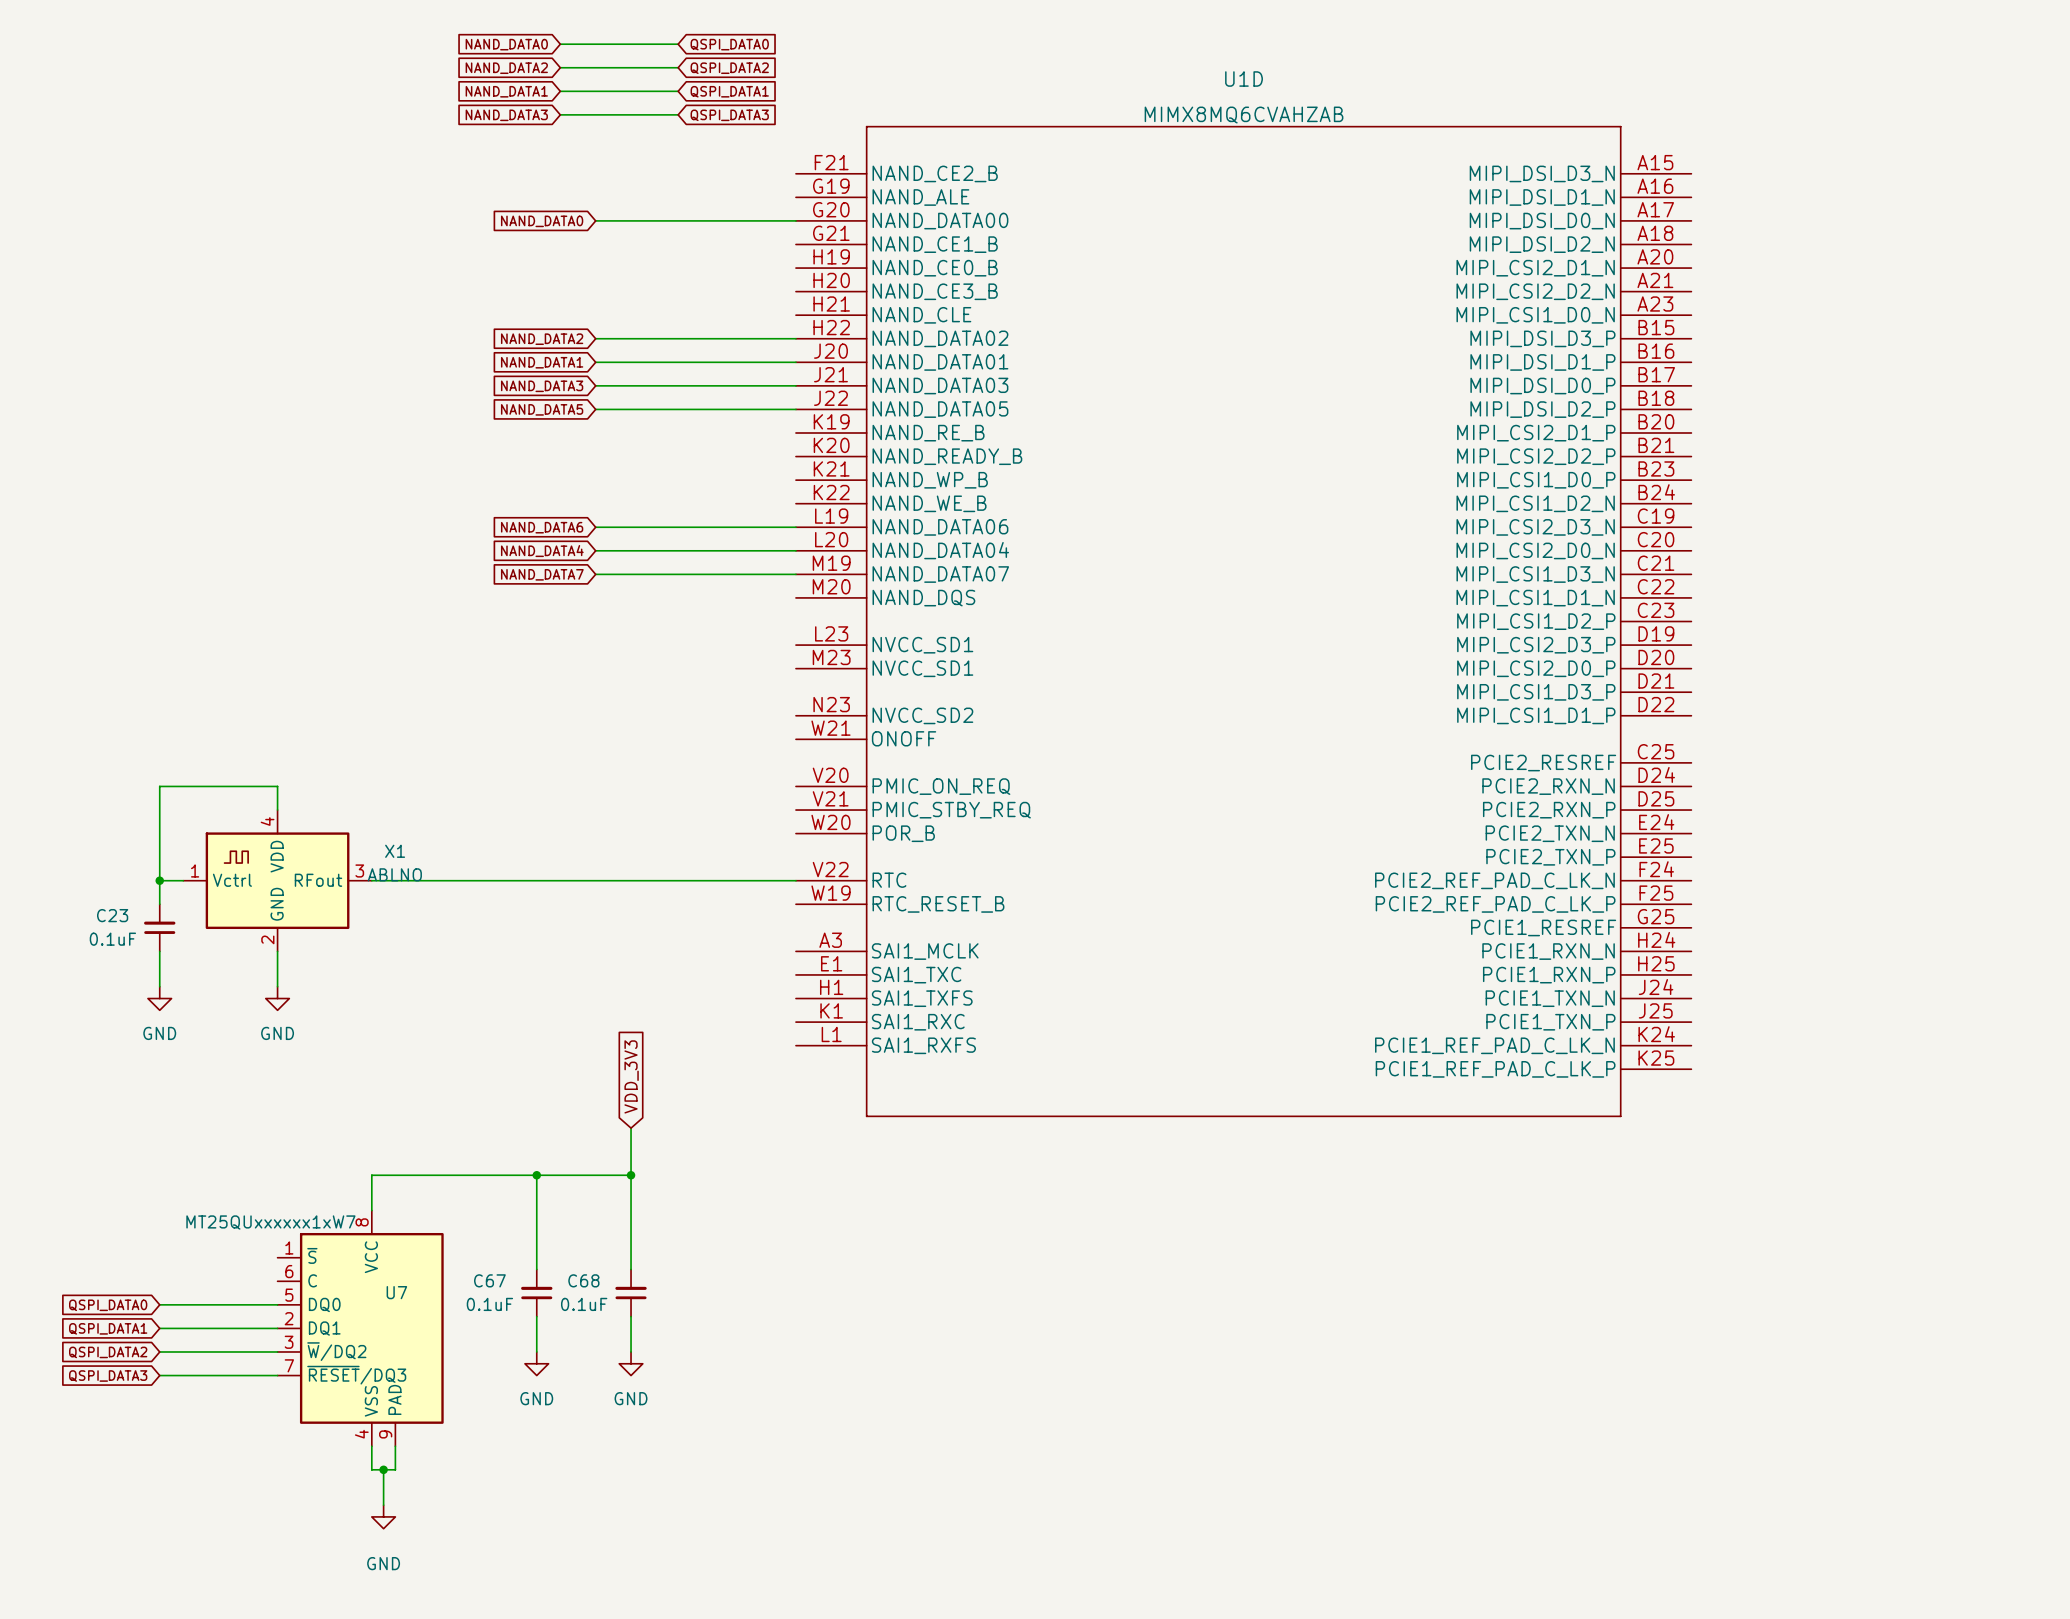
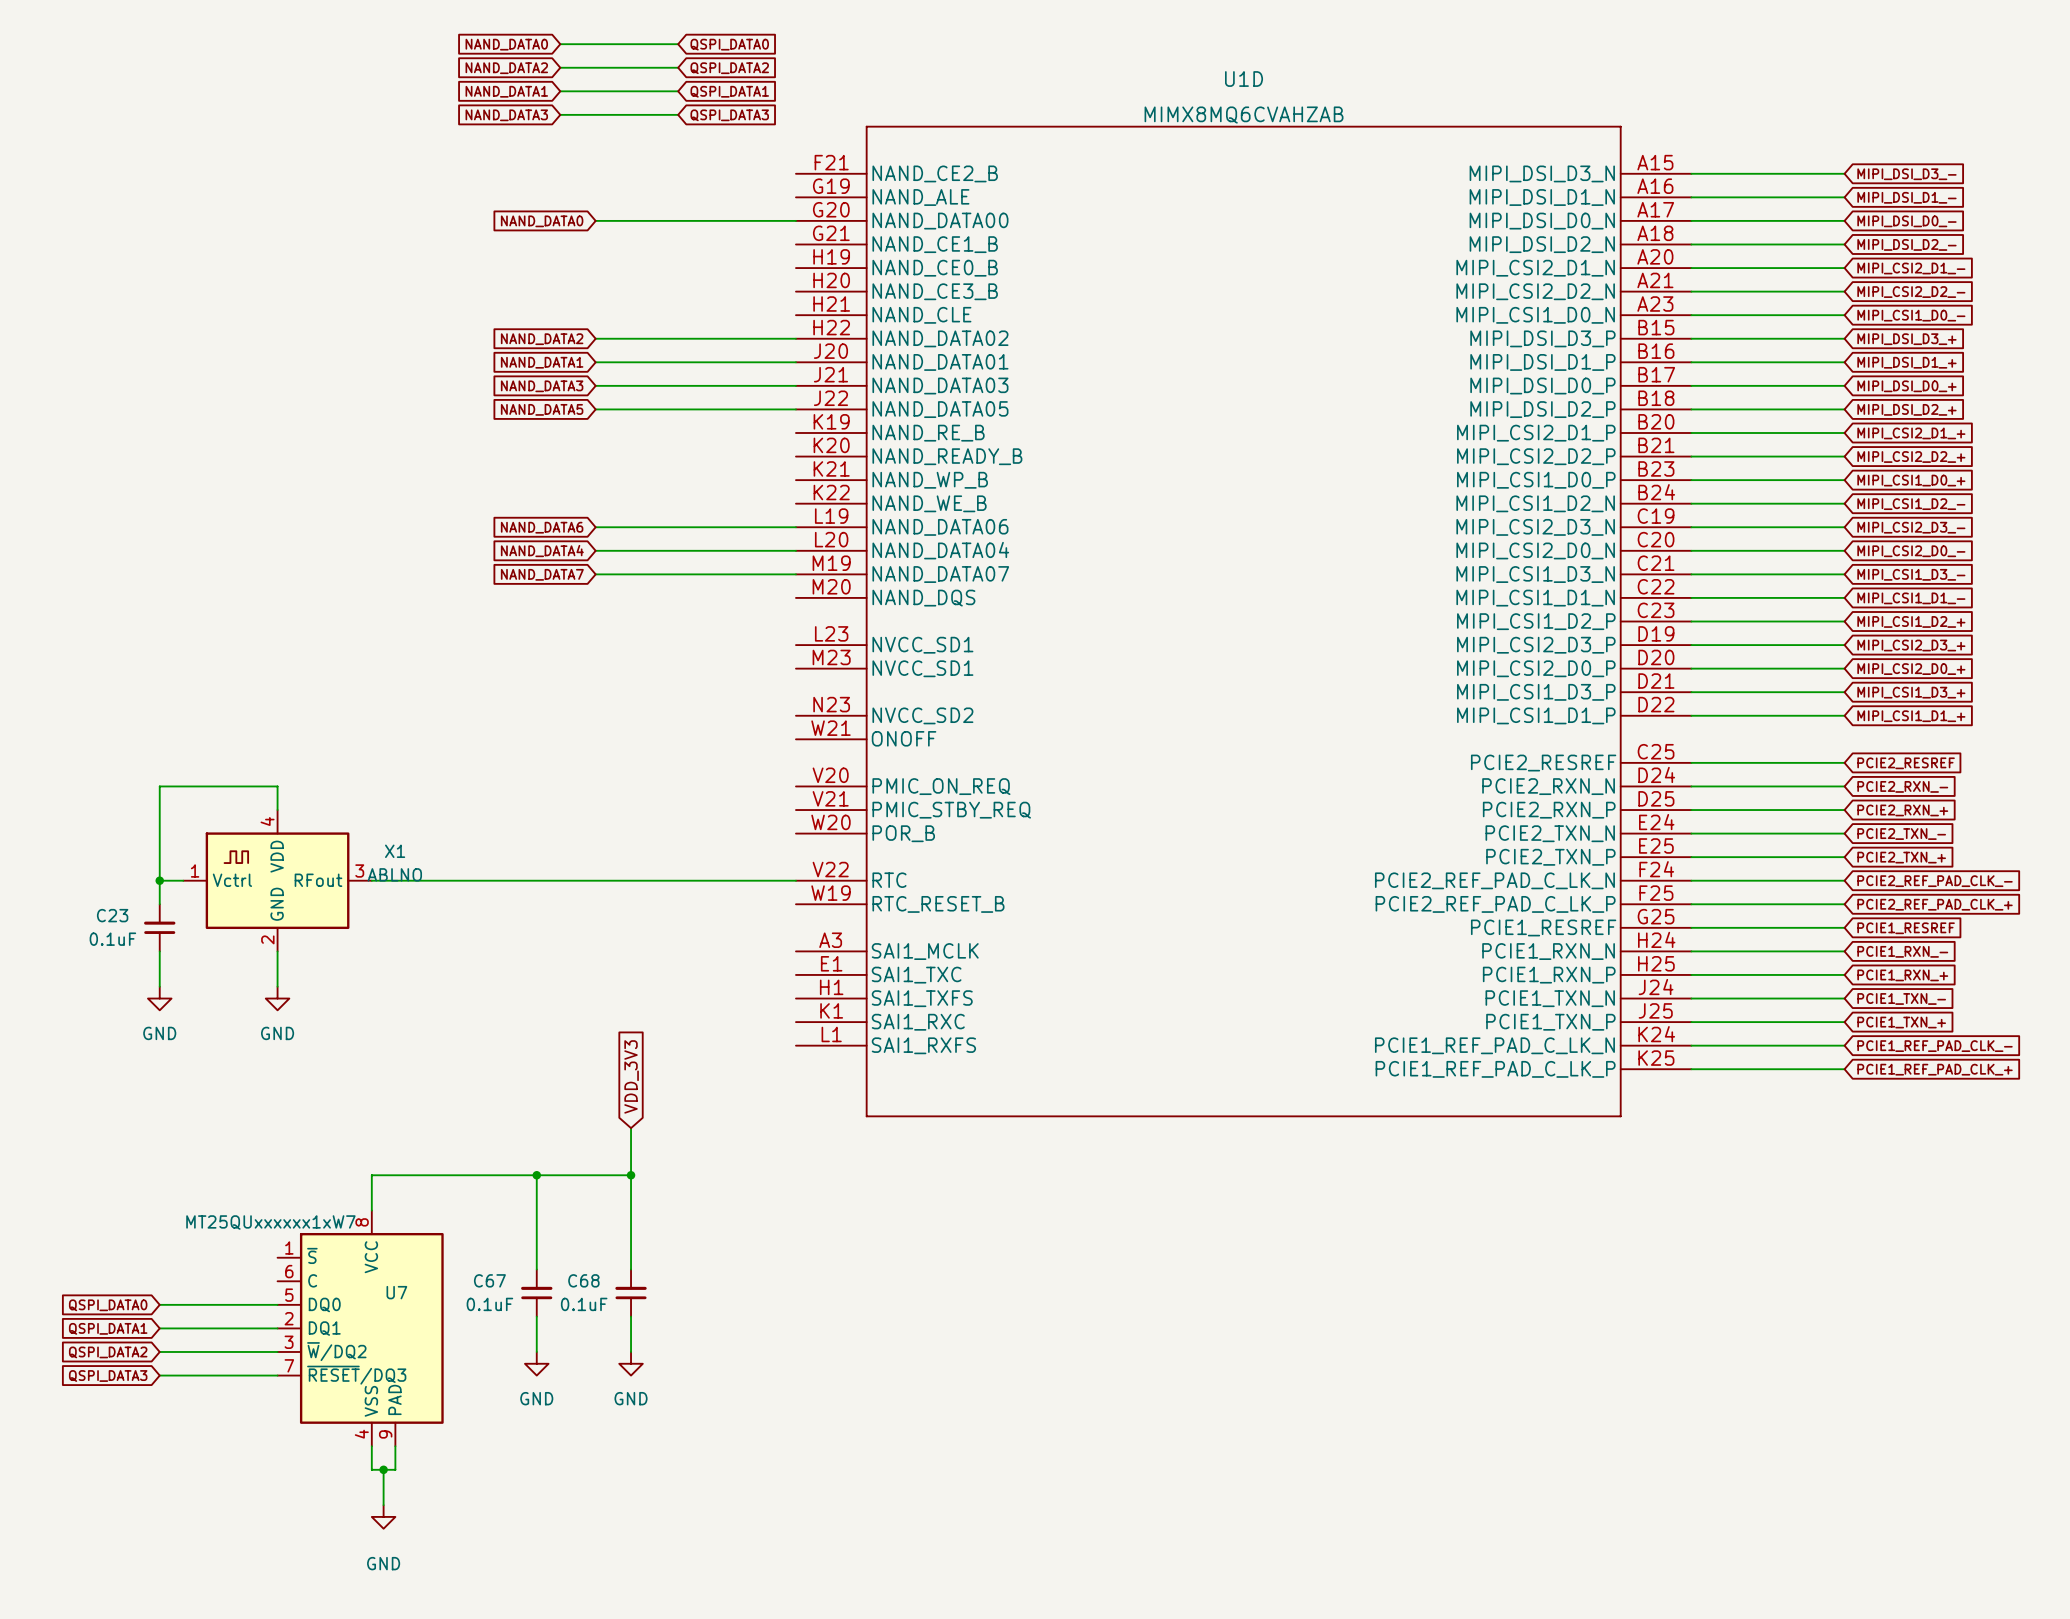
wire: none -> (1691, 173) (1844, 173)
global label: none -> MIPI_DSI_D3_- (1906, 174)
wire: none -> (1691, 197) (1844, 197)
global label: none -> MIPI_DSI_D1_- (1906, 197)
wire: none -> (1691, 220) (1844, 220)
global label: none -> MIPI_DSI_D0_- (1906, 221)
wire: none -> (1691, 244) (1844, 244)
global label: none -> MIPI_DSI_D2_- (1906, 244)
wire: none -> (1691, 268) (1844, 268)
global label: none -> MIPI_CSI2_D1_- (1911, 268)
wire: none -> (1691, 291) (1844, 291)
global label: none -> MIPI_CSI2_D2_- (1911, 292)
wire: none -> (1691, 315) (1844, 315)
global label: none -> MIPI_CSI1_D0_- (1911, 315)
wire: none -> (1691, 338) (1844, 338)
global label: none -> MIPI_DSI_D3_+ (1906, 339)
wire: none -> (1691, 362) (1844, 362)
global label: none -> MIPI_DSI_D1_+ (1906, 362)
wire: none -> (1691, 385) (1844, 385)
global label: none -> MIPI_DSI_D0_+ (1906, 386)
wire: none -> (1691, 409) (1844, 409)
global label: none -> MIPI_DSI_D2_+ (1906, 409)
wire: none -> (1691, 432) (1844, 432)
global label: none -> MIPI_CSI2_D1_+ (1911, 433)
wire: none -> (1691, 456) (1844, 456)
global label: none -> MIPI_CSI2_D2_+ (1911, 457)
wire: none -> (1691, 480) (1844, 480)
global label: none -> MIPI_CSI1_D0_+ (1911, 480)
wire: none -> (1691, 503) (1844, 503)
global label: none -> MIPI_CSI1_D2_- (1911, 504)
wire: none -> (1691, 527) (1844, 527)
global label: none -> MIPI_CSI2_D3_- (1911, 527)
wire: none -> (1691, 550) (1844, 550)
global label: none -> MIPI_CSI2_D0_- (1911, 551)
wire: none -> (1691, 574) (1844, 574)
global label: none -> MIPI_CSI1_D3_- (1911, 574)
wire: none -> (1691, 597) (1844, 597)
global label: none -> MIPI_CSI1_D1_- (1911, 598)
wire: none -> (1691, 621) (1844, 621)
global label: none -> MIPI_CSI1_D2_+ (1911, 621)
wire: none -> (1691, 645) (1844, 645)
global label: none -> MIPI_CSI2_D3_+ (1911, 645)
wire: none -> (1691, 668) (1844, 668)
global label: none -> MIPI_CSI2_D0_+ (1911, 669)
wire: none -> (1691, 692) (1844, 692)
global label: none -> MIPI_CSI1_D3_+ (1911, 692)
wire: none -> (1691, 715) (1844, 715)
global label: none -> MIPI_CSI1_D1_+ (1911, 716)
wire: none -> (1691, 762) (1844, 762)
global label: none -> PCIE2_RESREF (1906, 763)
wire: none -> (1691, 786) (1844, 786)
global label: none -> PCIE2_RXN_- (1902, 786)
wire: none -> (1691, 810) (1844, 810)
global label: none -> PCIE2_RXN_+ (1902, 810)
wire: none -> (1691, 833) (1844, 833)
global label: none -> PCIE2_TXN_- (1901, 834)
wire: none -> (1691, 857) (1844, 857)
global label: none -> PCIE2_TXN_+ (1901, 857)
wire: none -> (1691, 880) (1844, 880)
global label: none -> PCIE2_REF_PAD_CLK_- (1935, 881)
wire: none -> (1691, 904) (1844, 904)
global label: none -> PCIE2_REF_PAD_CLK_+ (1935, 904)
wire: none -> (1691, 927) (1844, 927)
global label: none -> PCIE1_RESREF (1906, 928)
wire: none -> (1691, 951) (1844, 951)
global label: none -> PCIE1_RXN_- (1902, 951)
wire: none -> (1691, 974) (1844, 974)
global label: none -> PCIE1_RXN_+ (1902, 975)
wire: none -> (1691, 998) (1844, 998)
global label: none -> PCIE1_TXN_- (1901, 998)
wire: none -> (1691, 1022) (1844, 1022)
global label: none -> PCIE1_TXN_+ (1901, 1022)
wire: none -> (1691, 1045) (1844, 1045)
global label: none -> PCIE1_REF_PAD_CLK_- (1935, 1046)
wire: none -> (1691, 1069) (1844, 1069)
global label: none -> PCIE1_REF_PAD_CLK_+ (1935, 1069)

